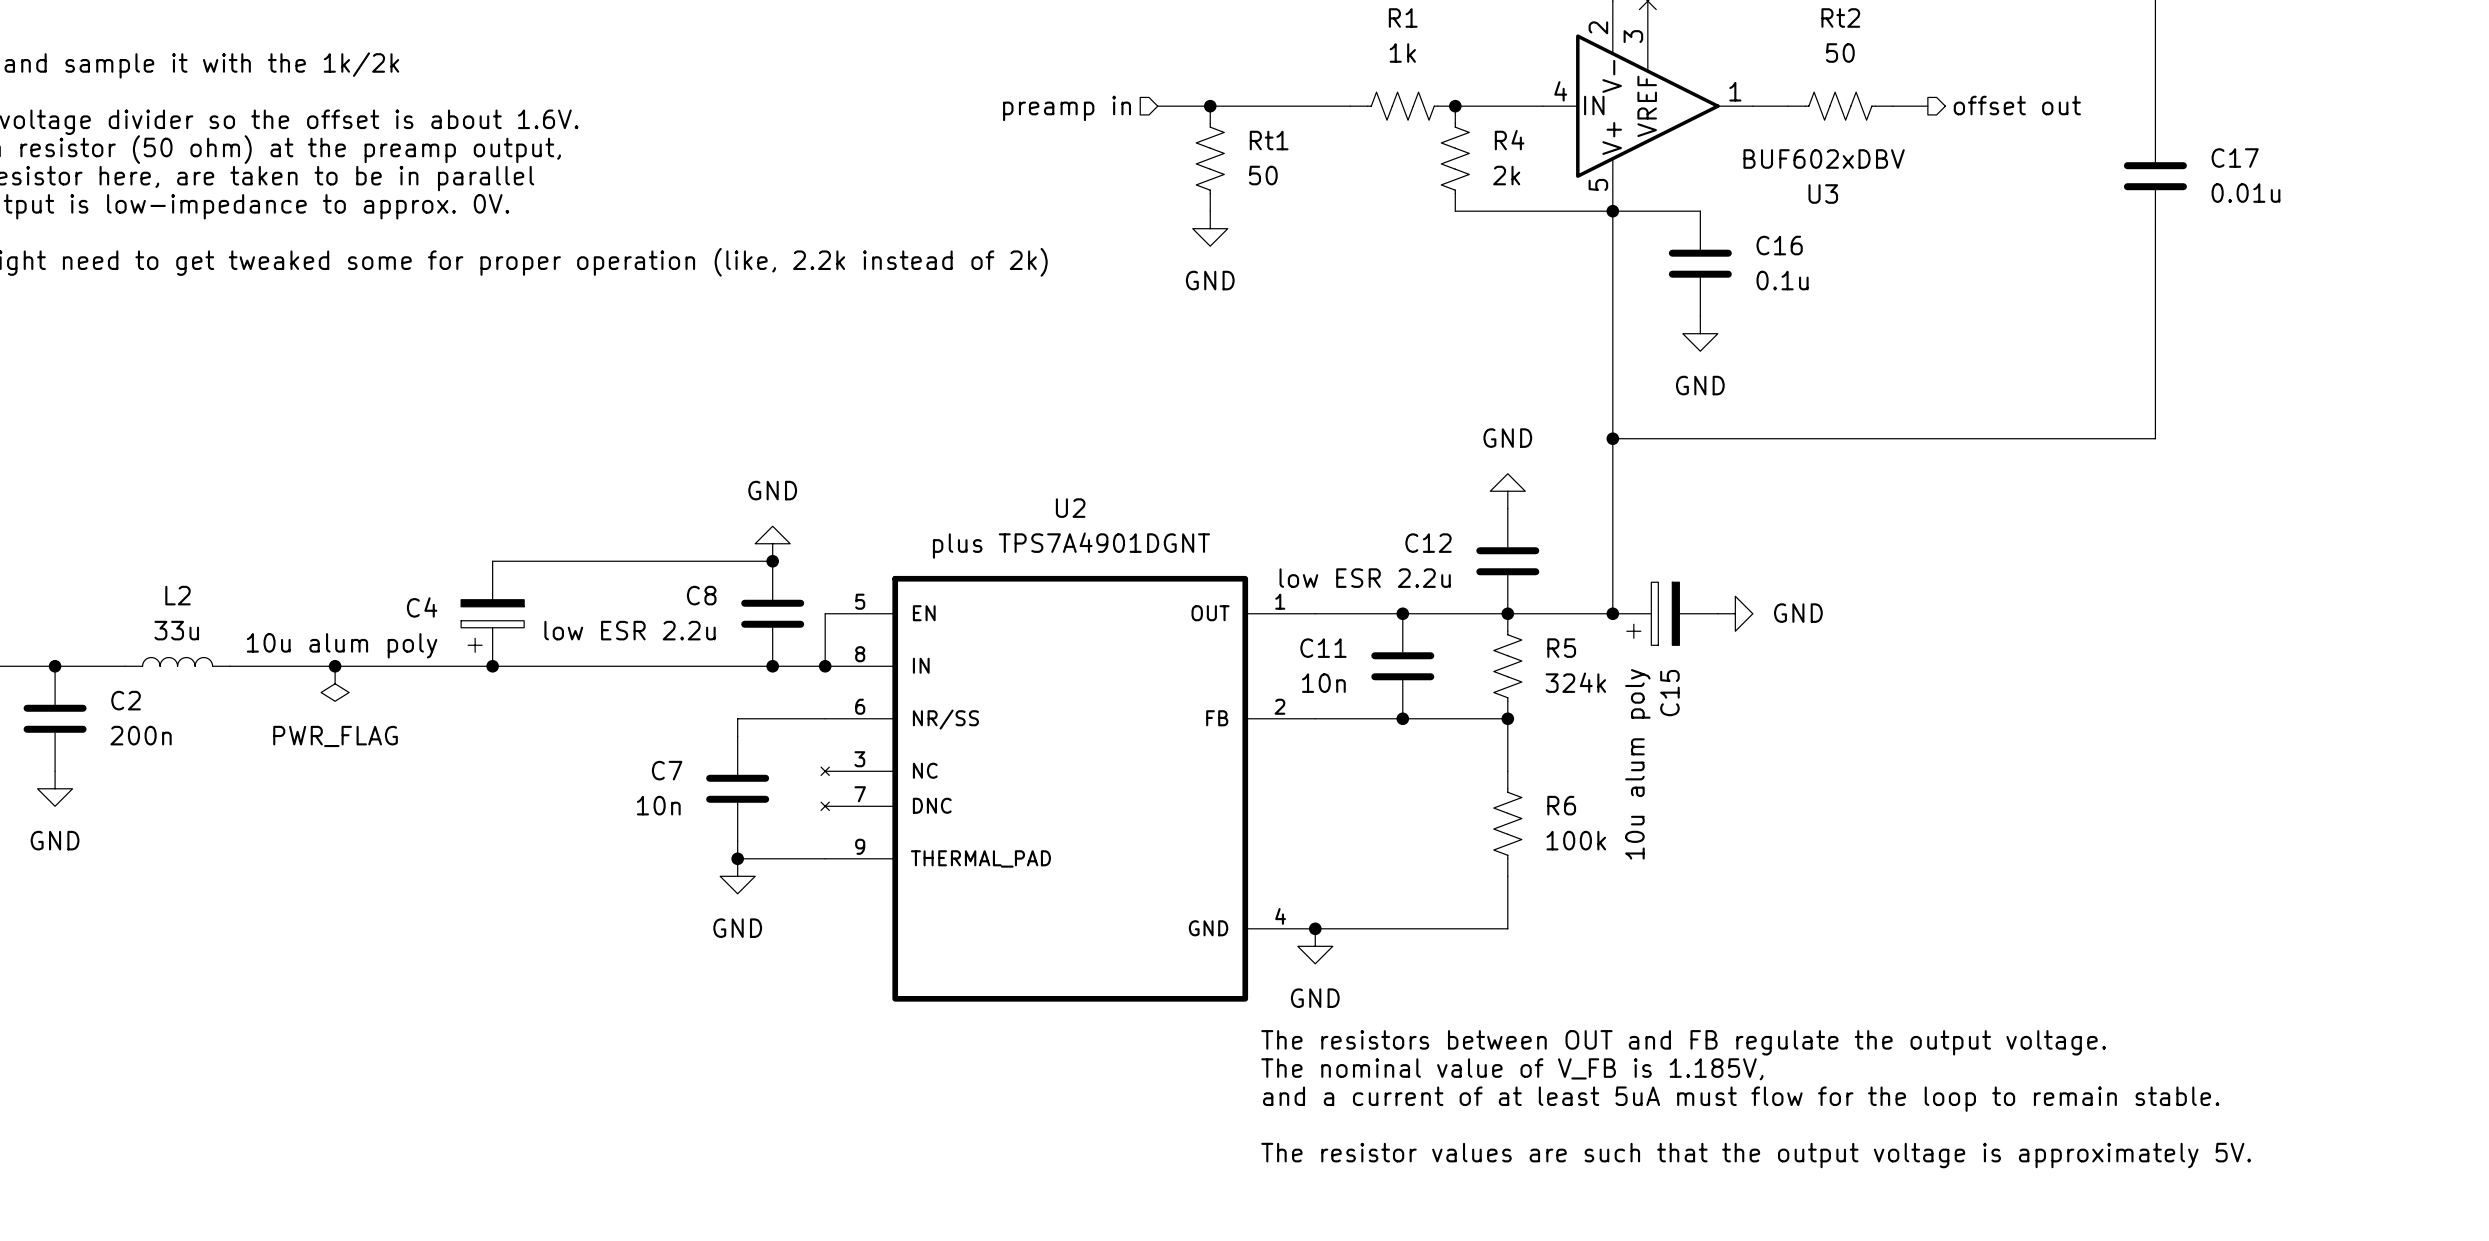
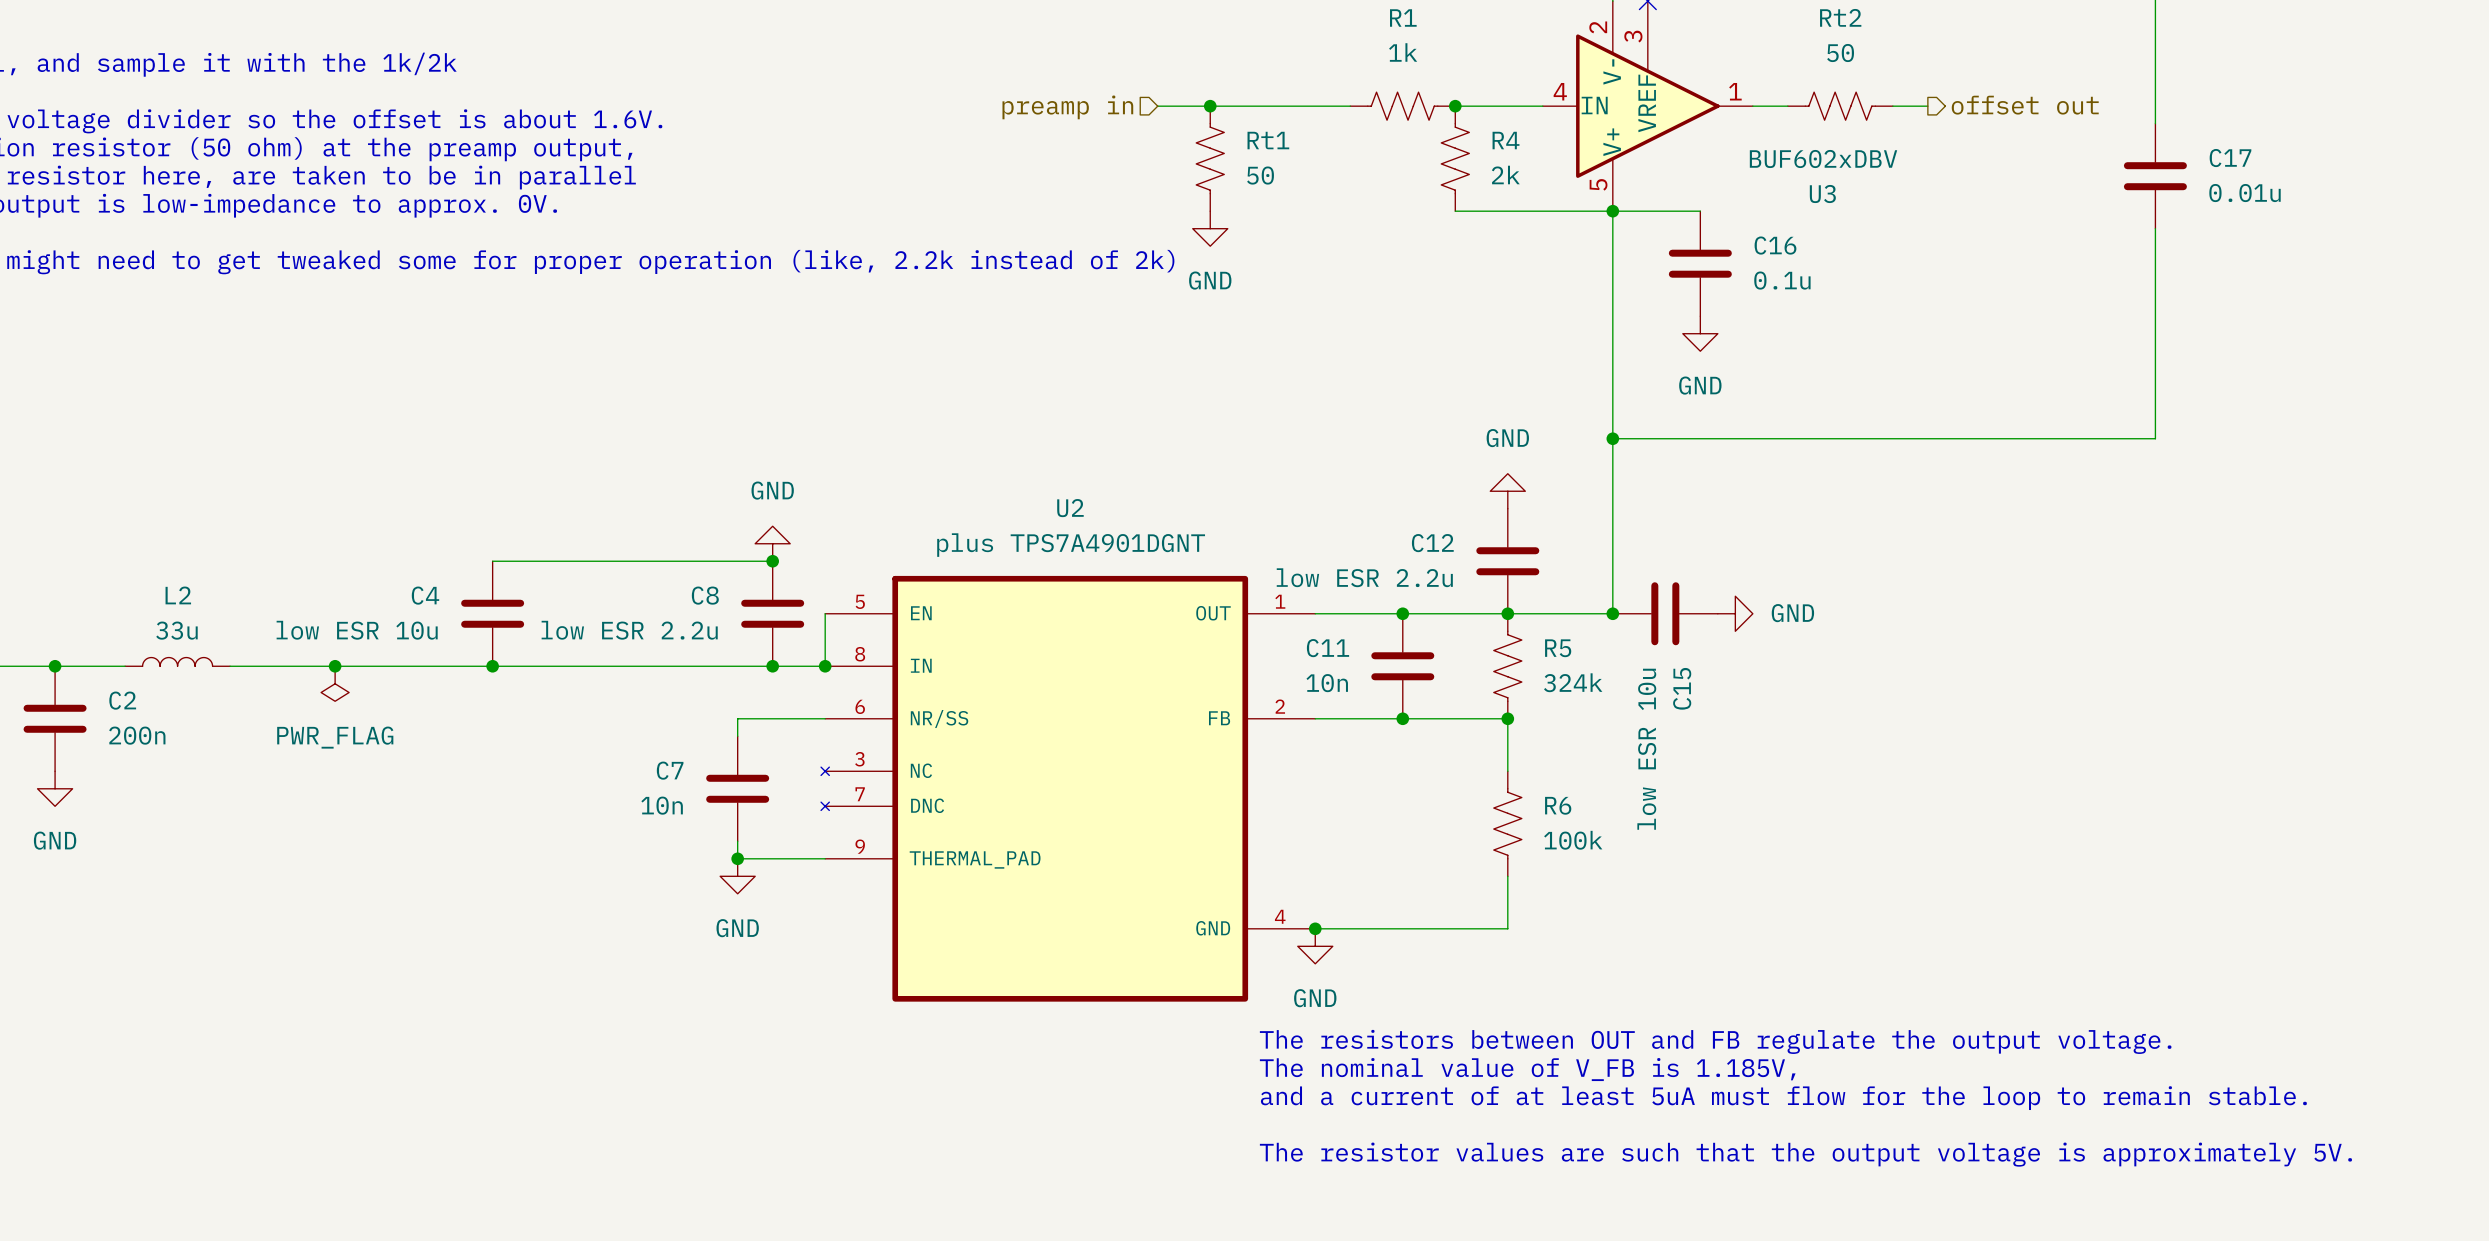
C4 symbol: [461, 561, 525, 667] -> [461, 561, 525, 667]
C15 symbol: [1612, 582, 1718, 646] -> [1612, 582, 1718, 646]
C4 value: 10u alum poly (342, 645) -> low ESR 10u (357, 630)
C15 value: 10u alum poly (1637, 764) -> low ESR 10u (1646, 749)

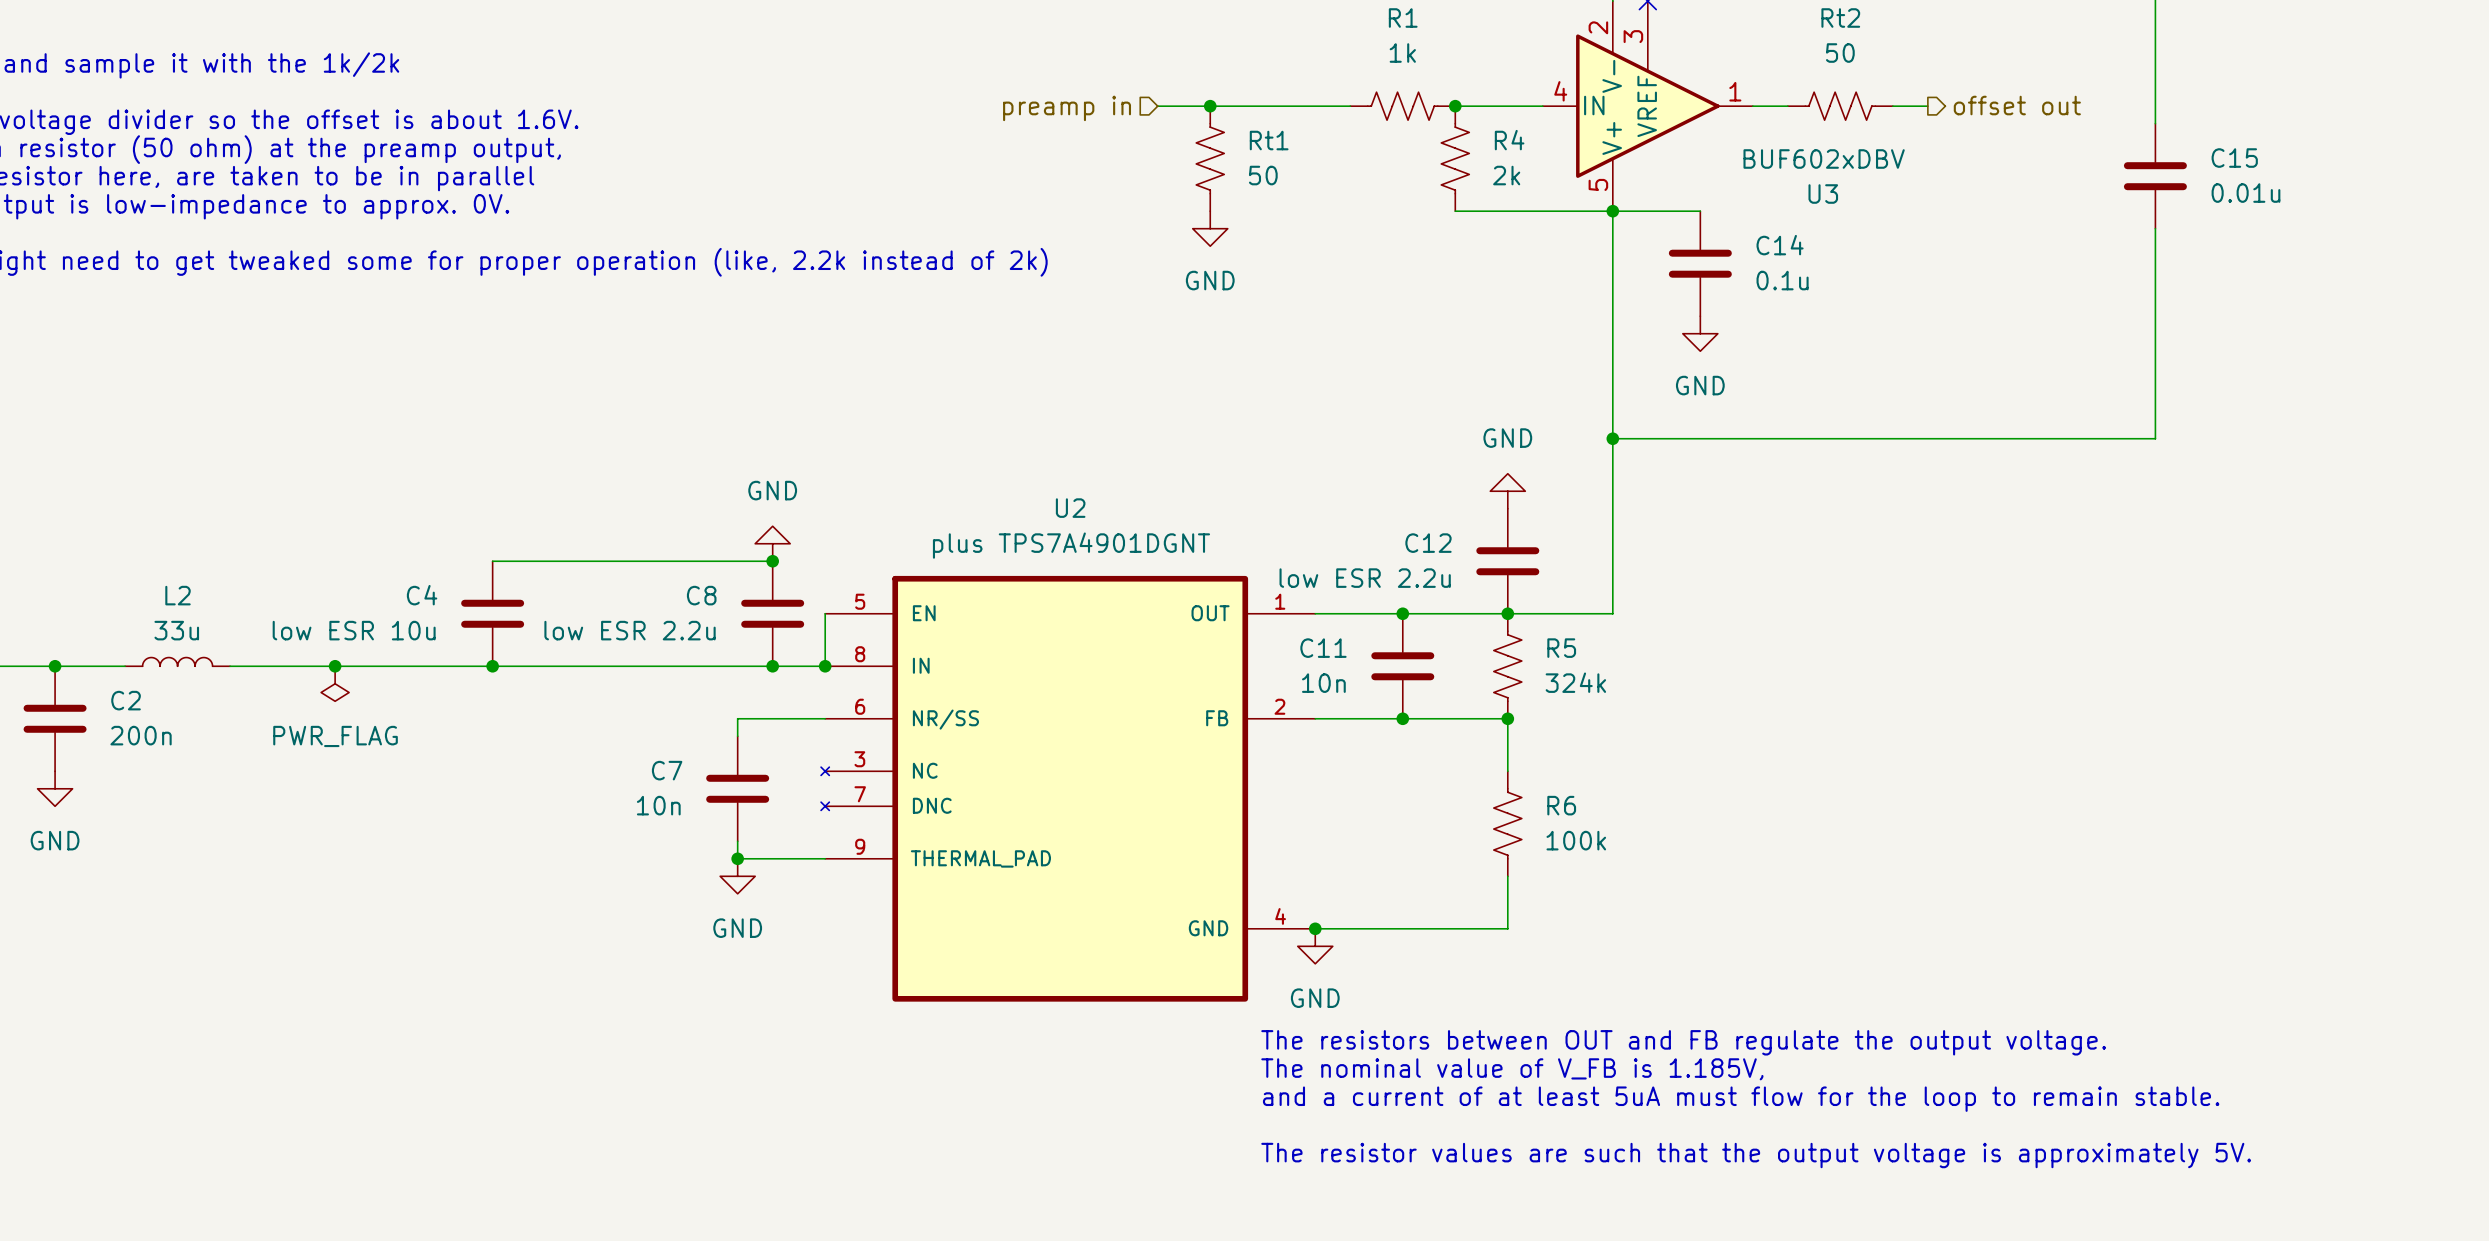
C17 name: C17 (2230, 158) -> C15 (2234, 158)
C16 name: C16 (1775, 245) -> C14 (1780, 245)
junction: (1612, 613) -> none
C15: low ESR 10u (1665, 613) -> none
power symbol: GND (1735, 613) -> none

